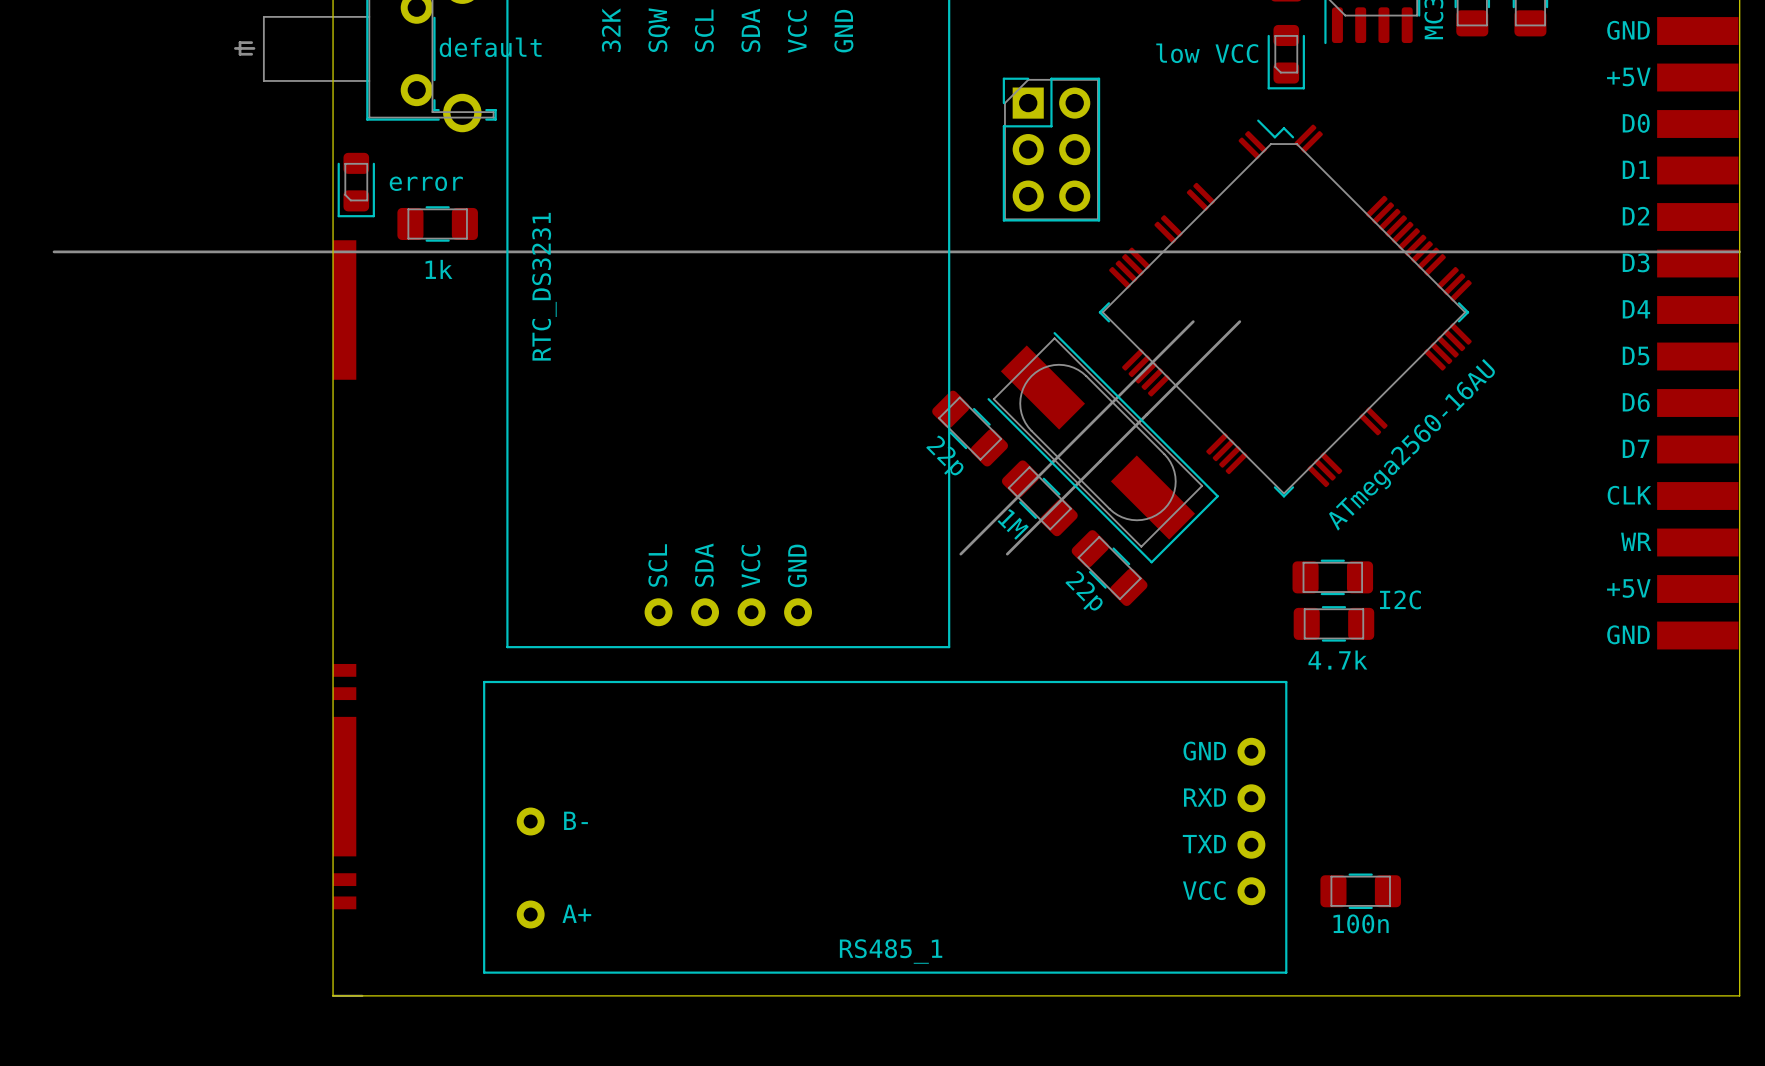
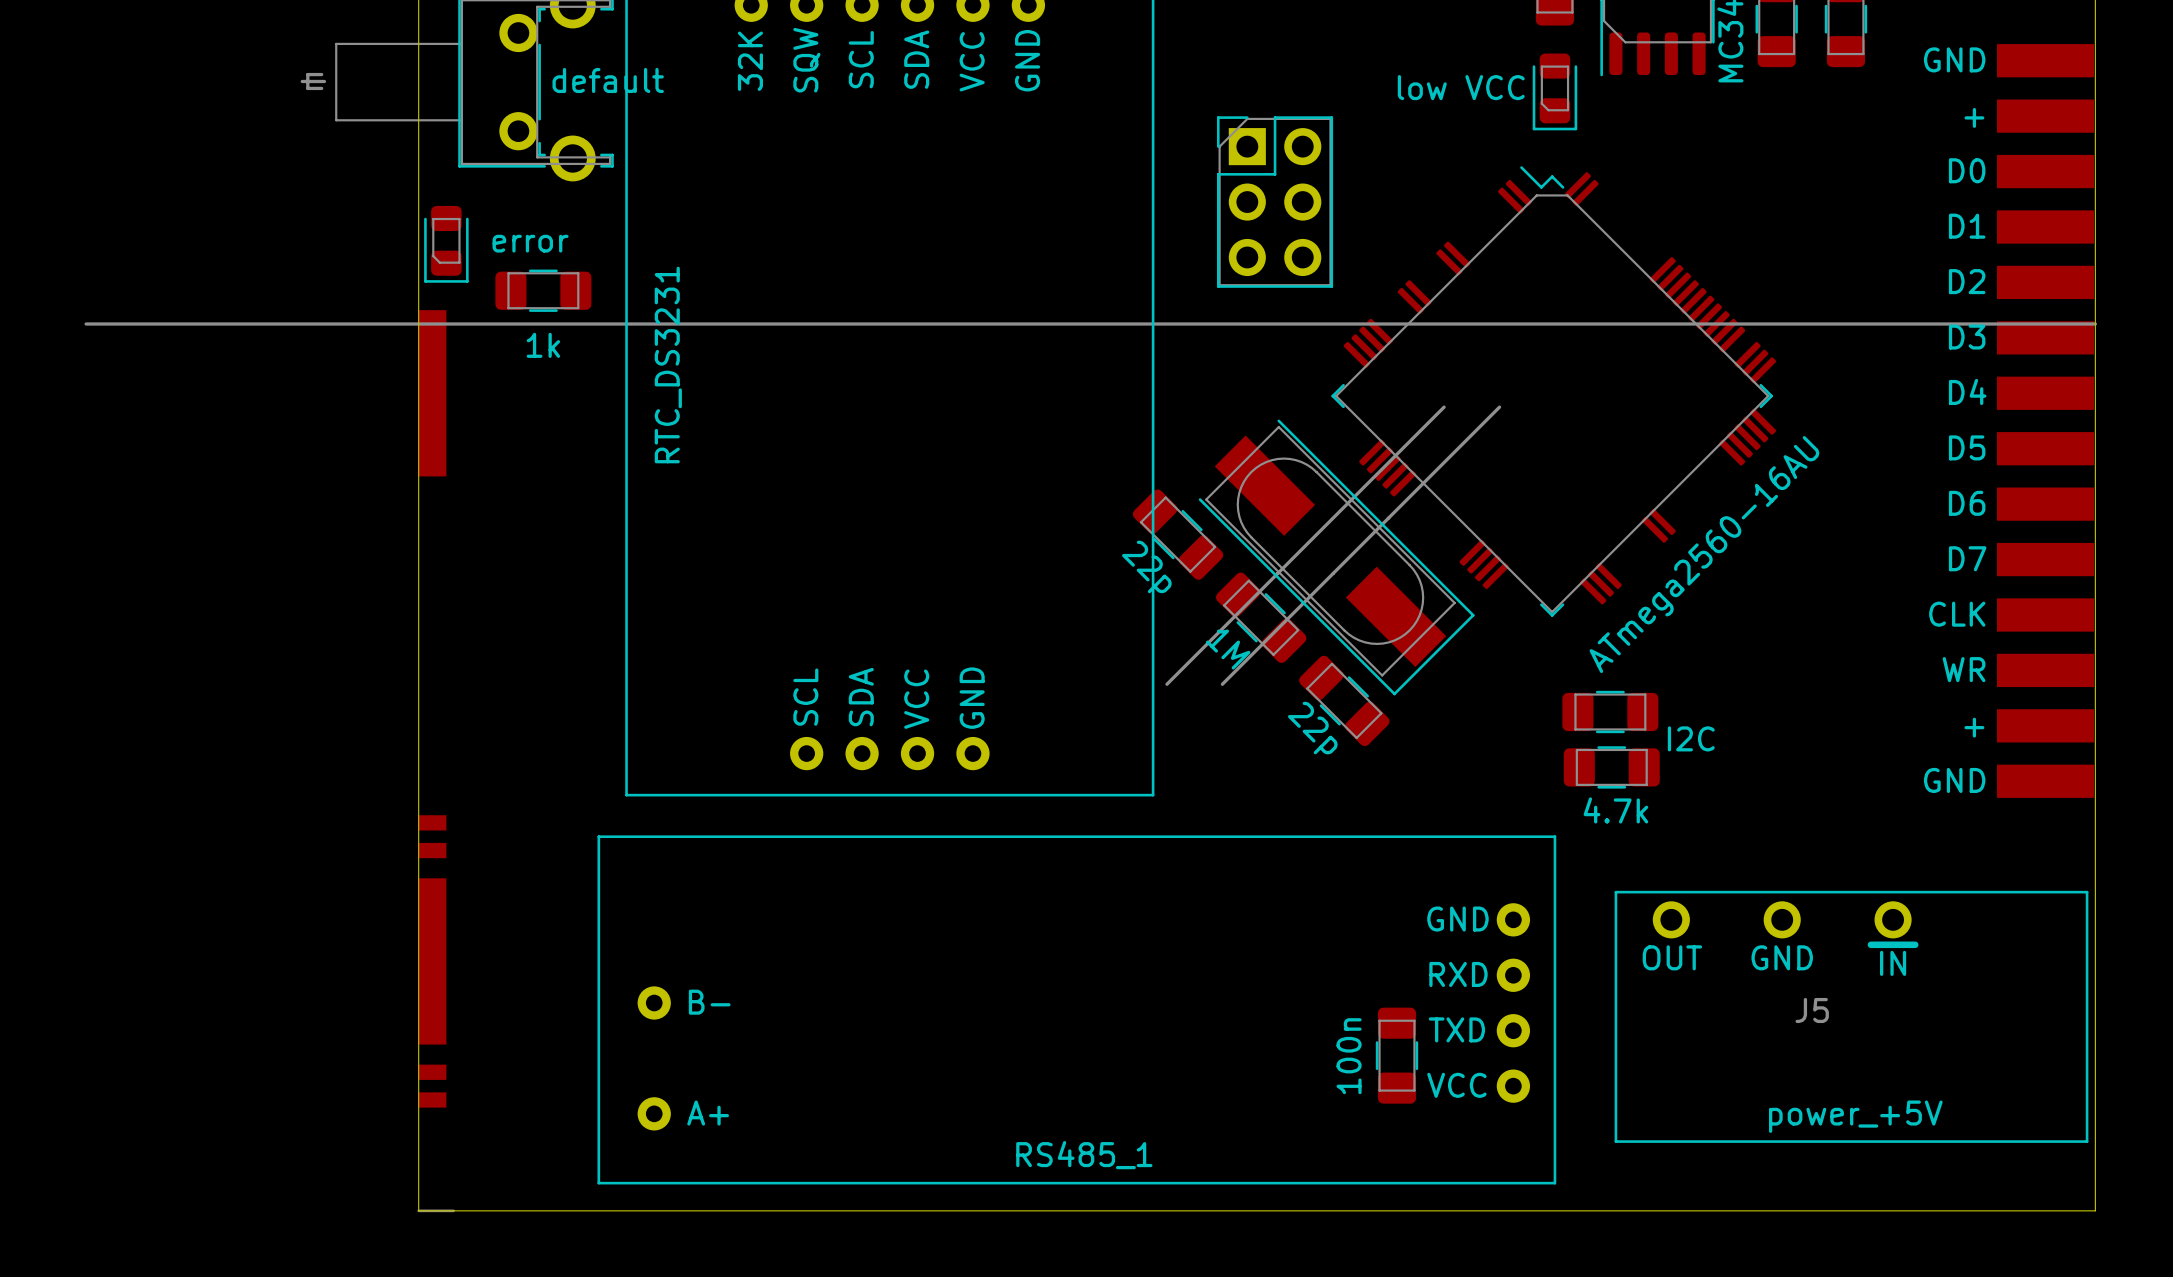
part text: +5V (1628, 77) -> + (1974, 117)
part text: +5V (1628, 588) -> + (1974, 727)
J5: none -> power_+5V (1851, 1016)
part rotation: 0° (1360, 891) -> 90° clockwise (1396, 1055)
part position: (1360, 891) -> (1396, 1055)

